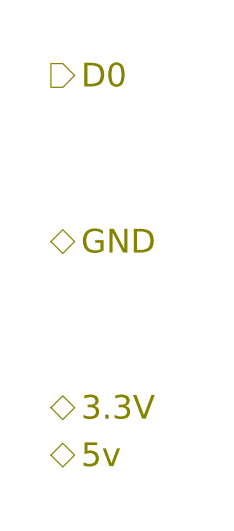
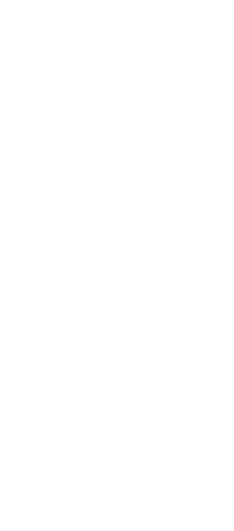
hierarchical label: D0 (104, 74) -> none
hierarchical label: GND (118, 240) -> none
hierarchical label: 3.3V (119, 406) -> none
hierarchical label: 5v (101, 454) -> none

